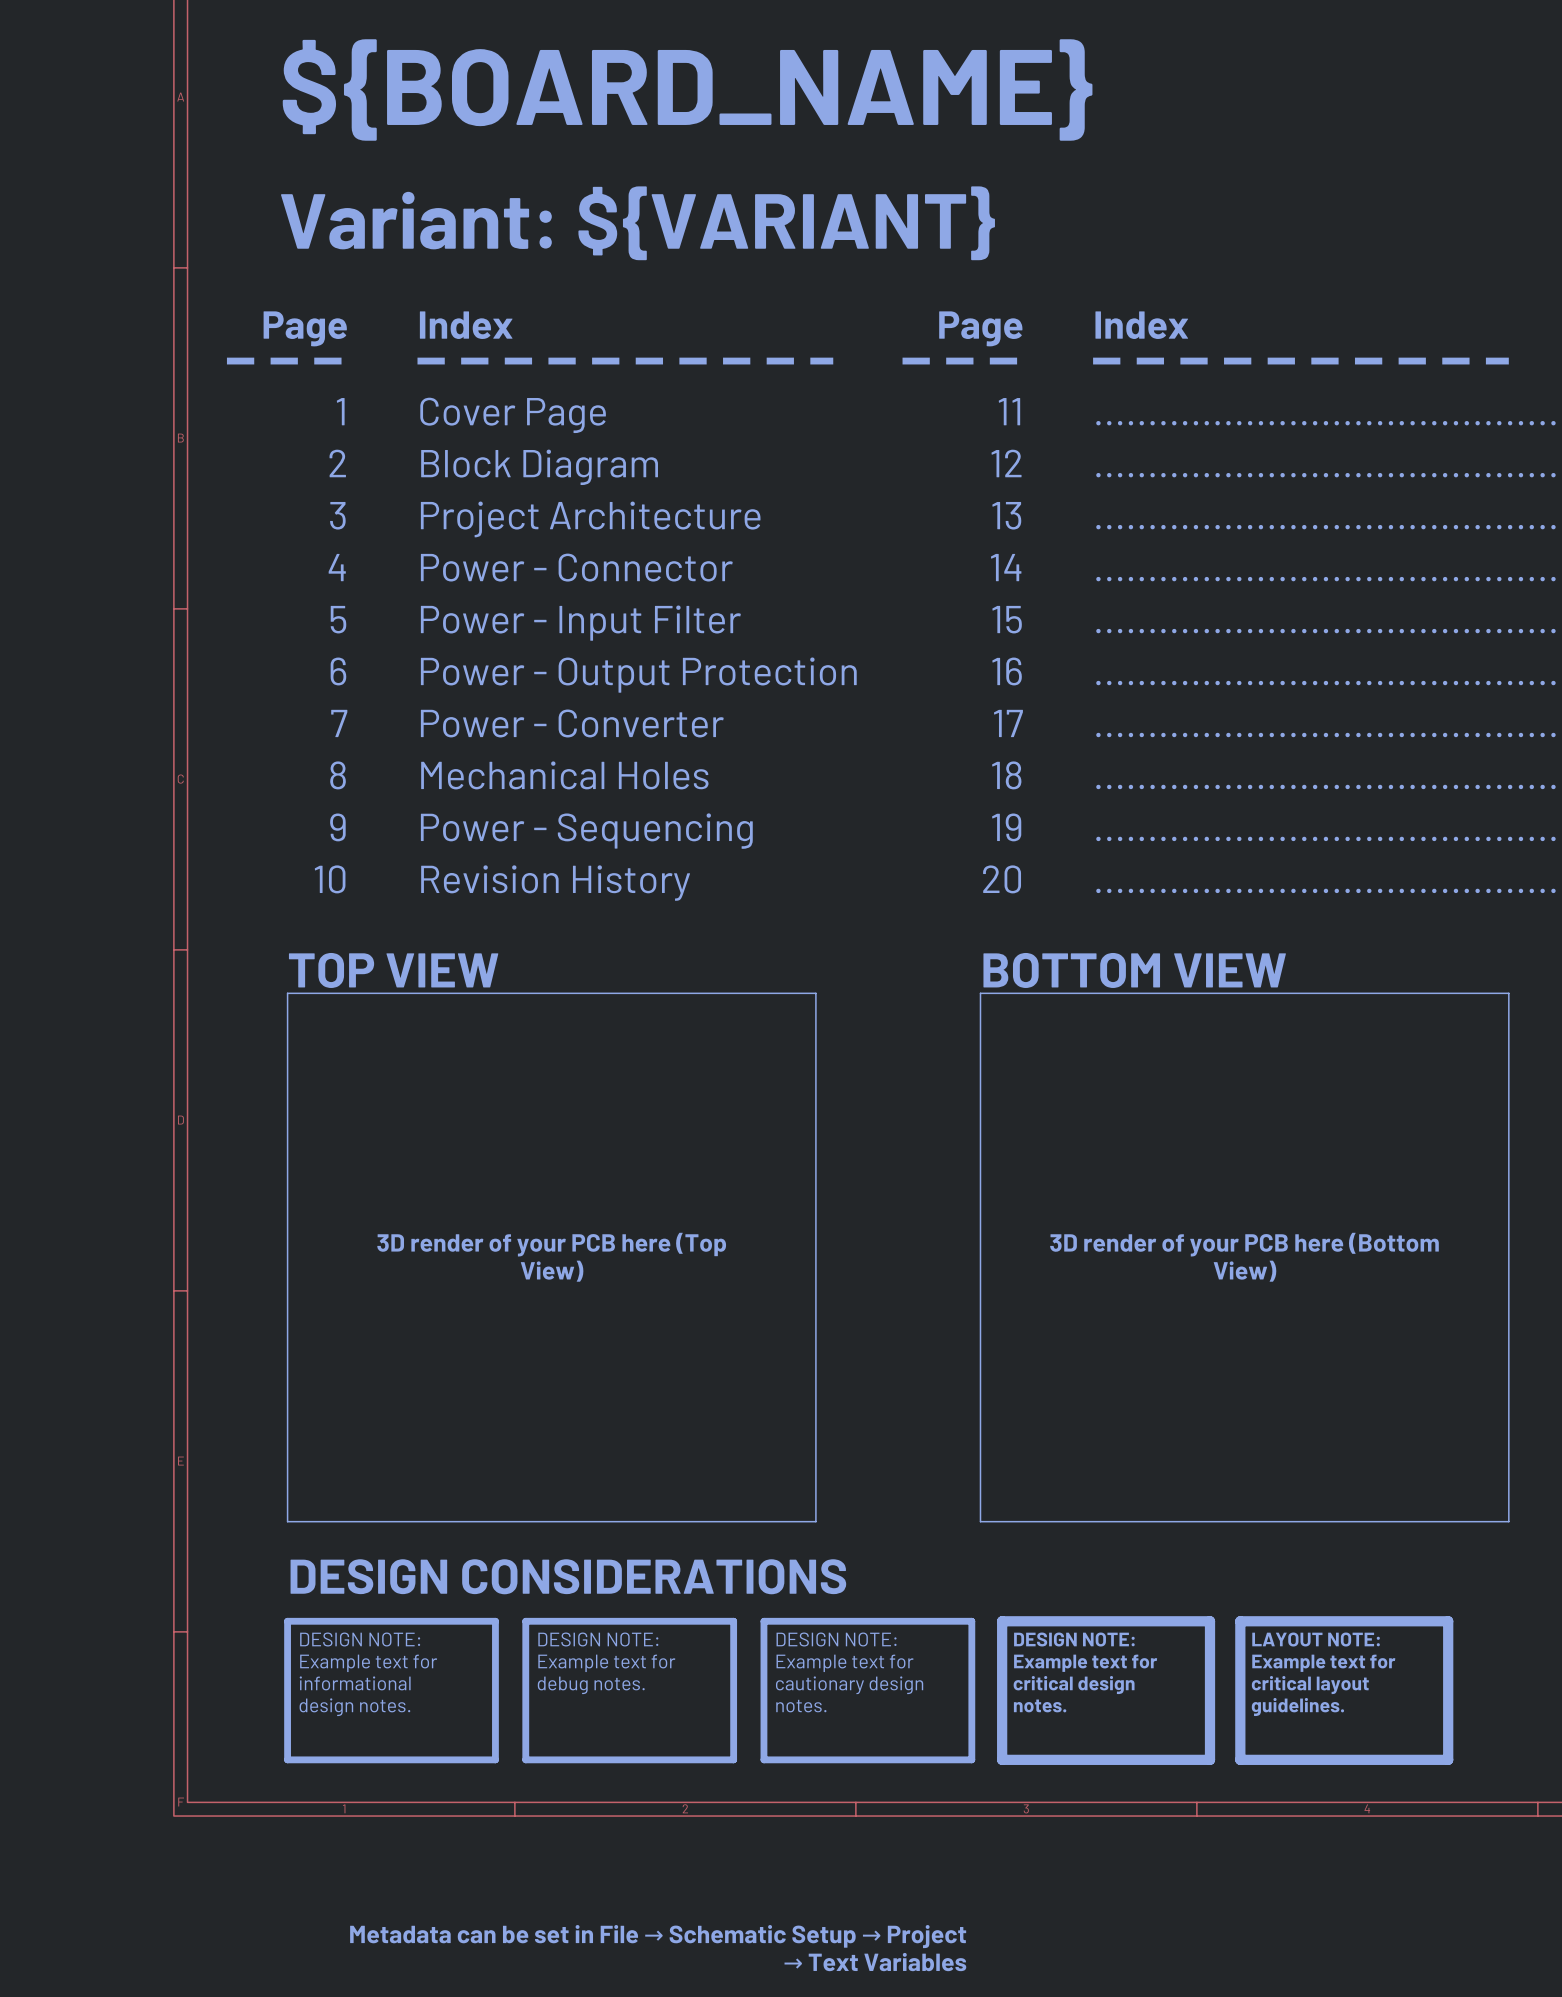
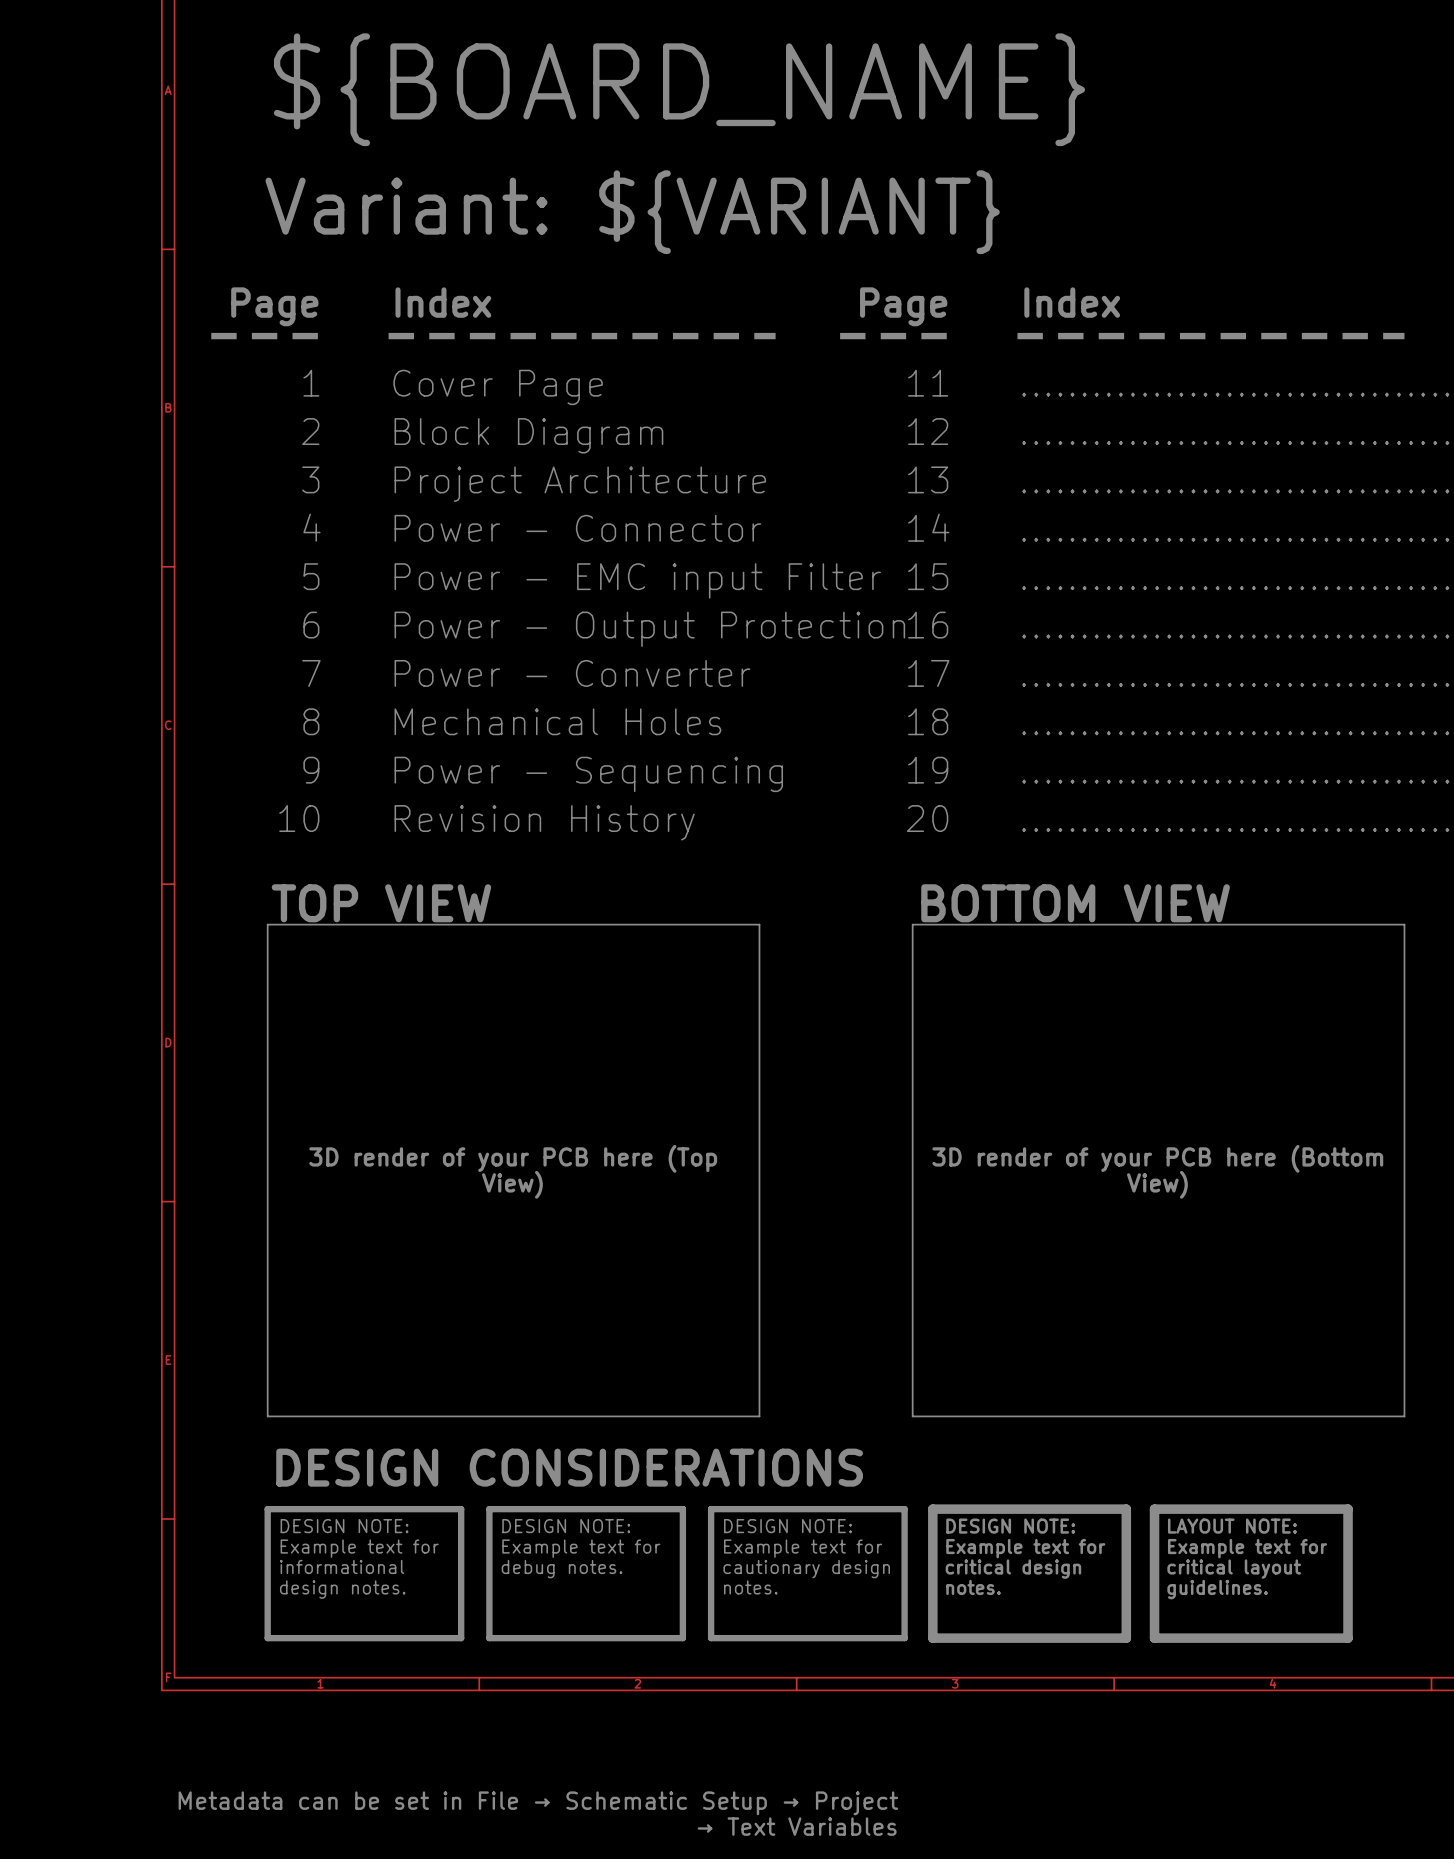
text: Power - Input Filter (580, 623) -> Power - EMC input Filter (637, 580)

